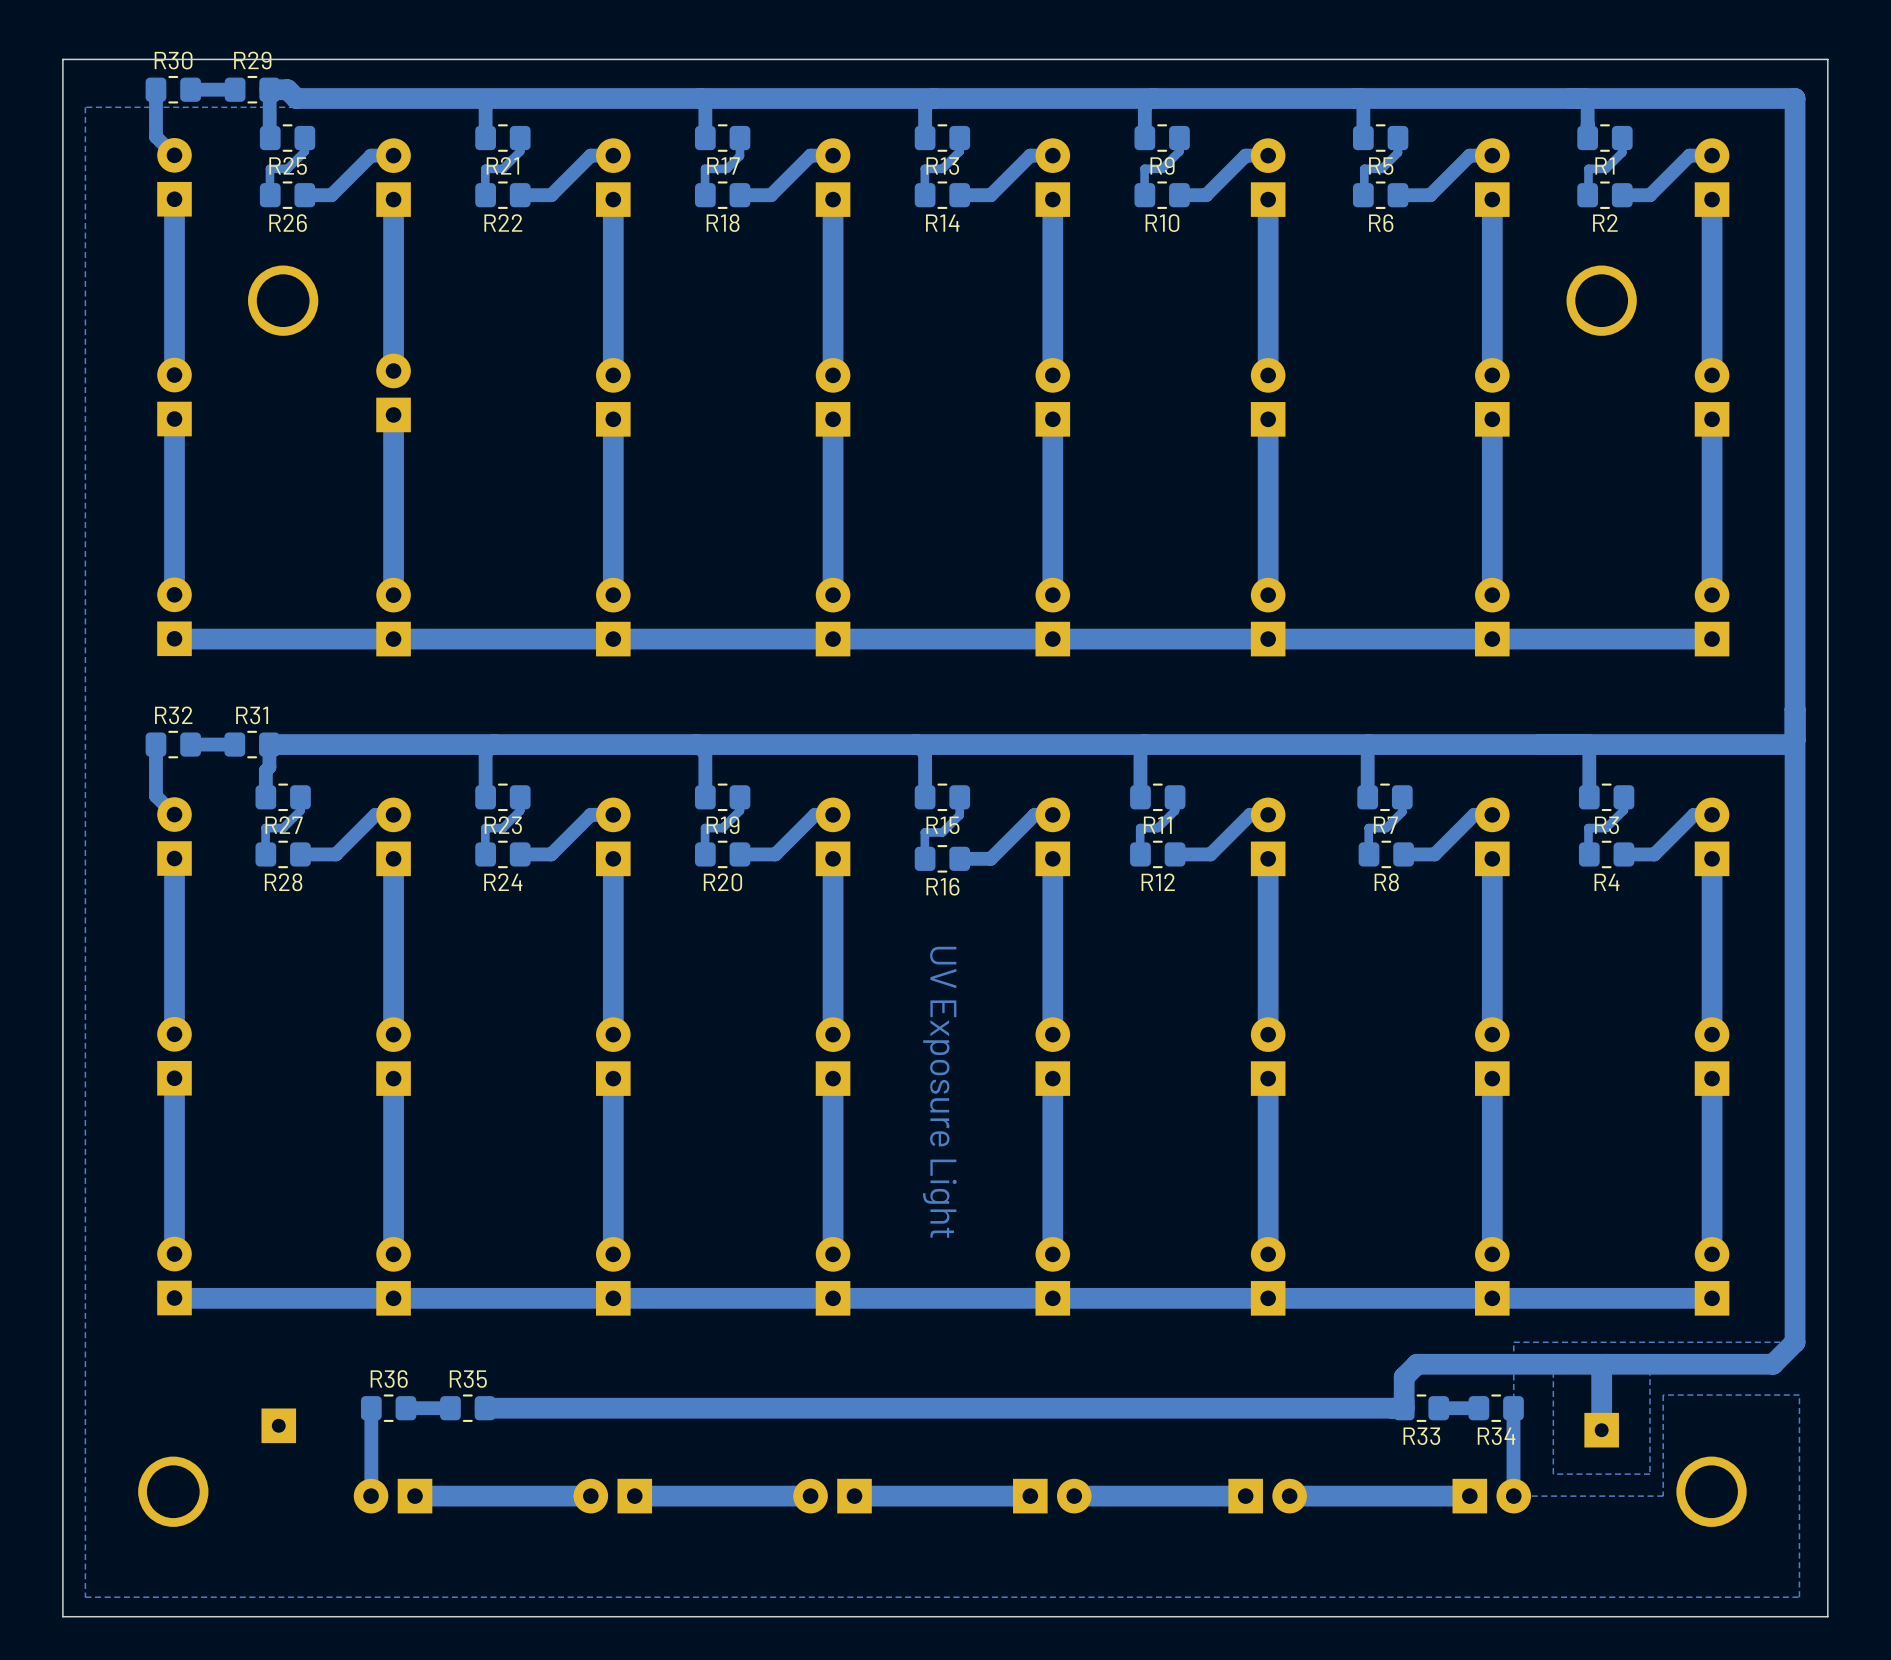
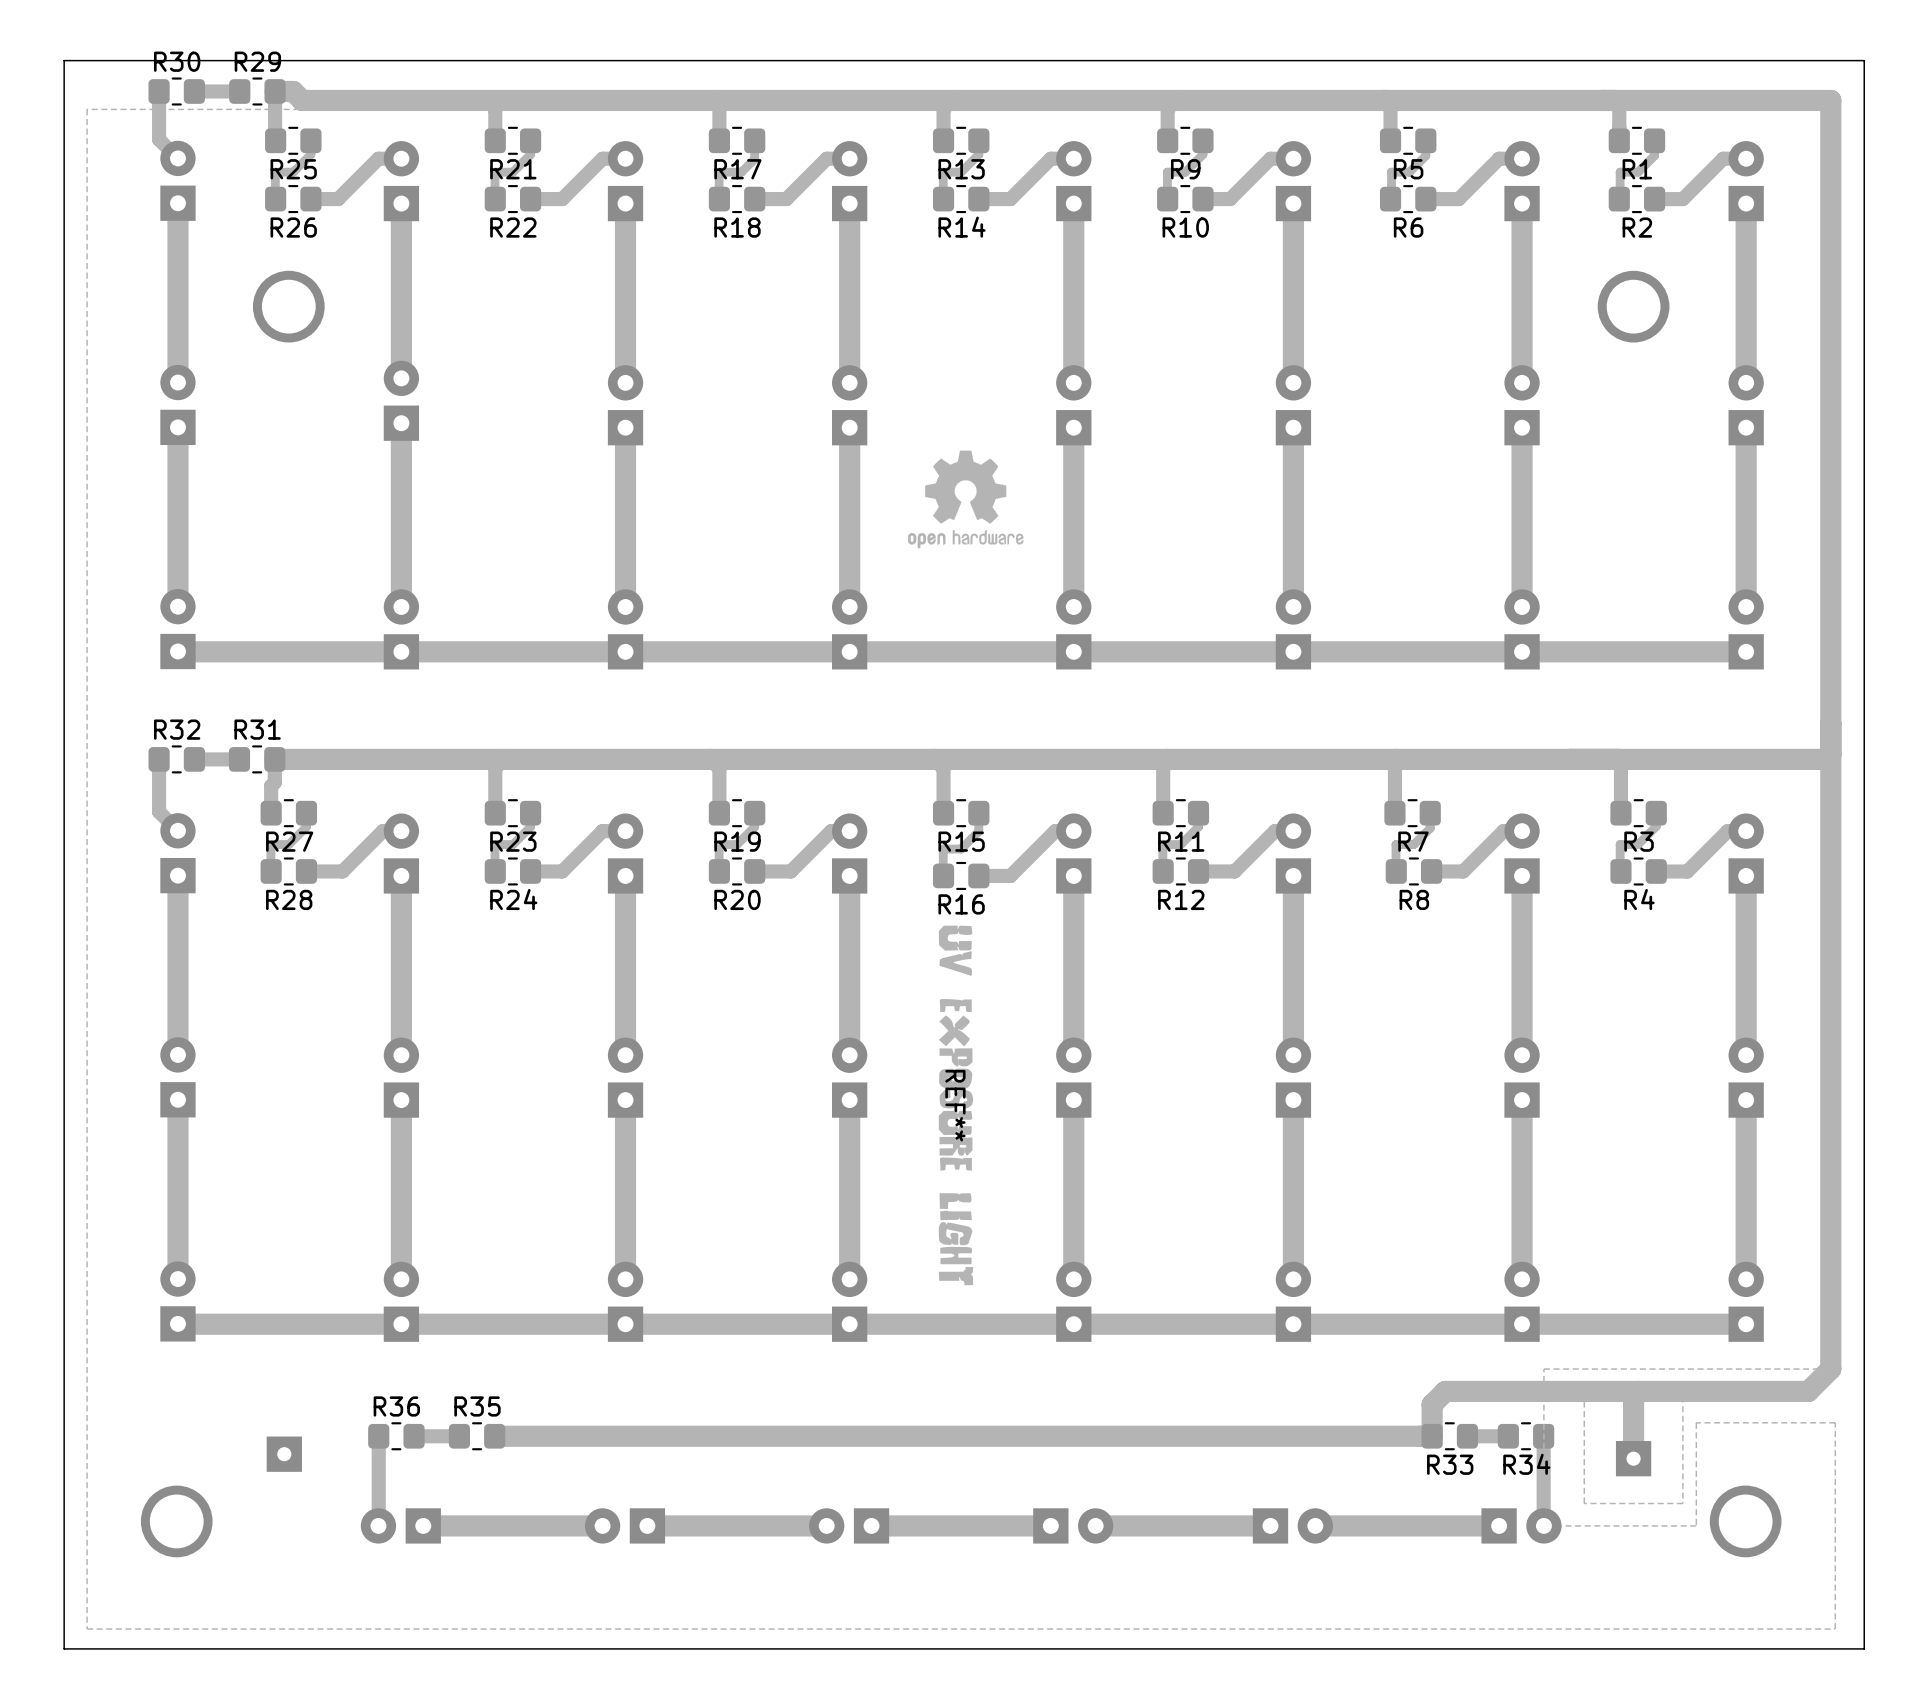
drawing: none -> [907, 450, 1024, 549]
REF**: none -> (956, 1105)
text: UV Exposure Light (939, 1092) -> none

